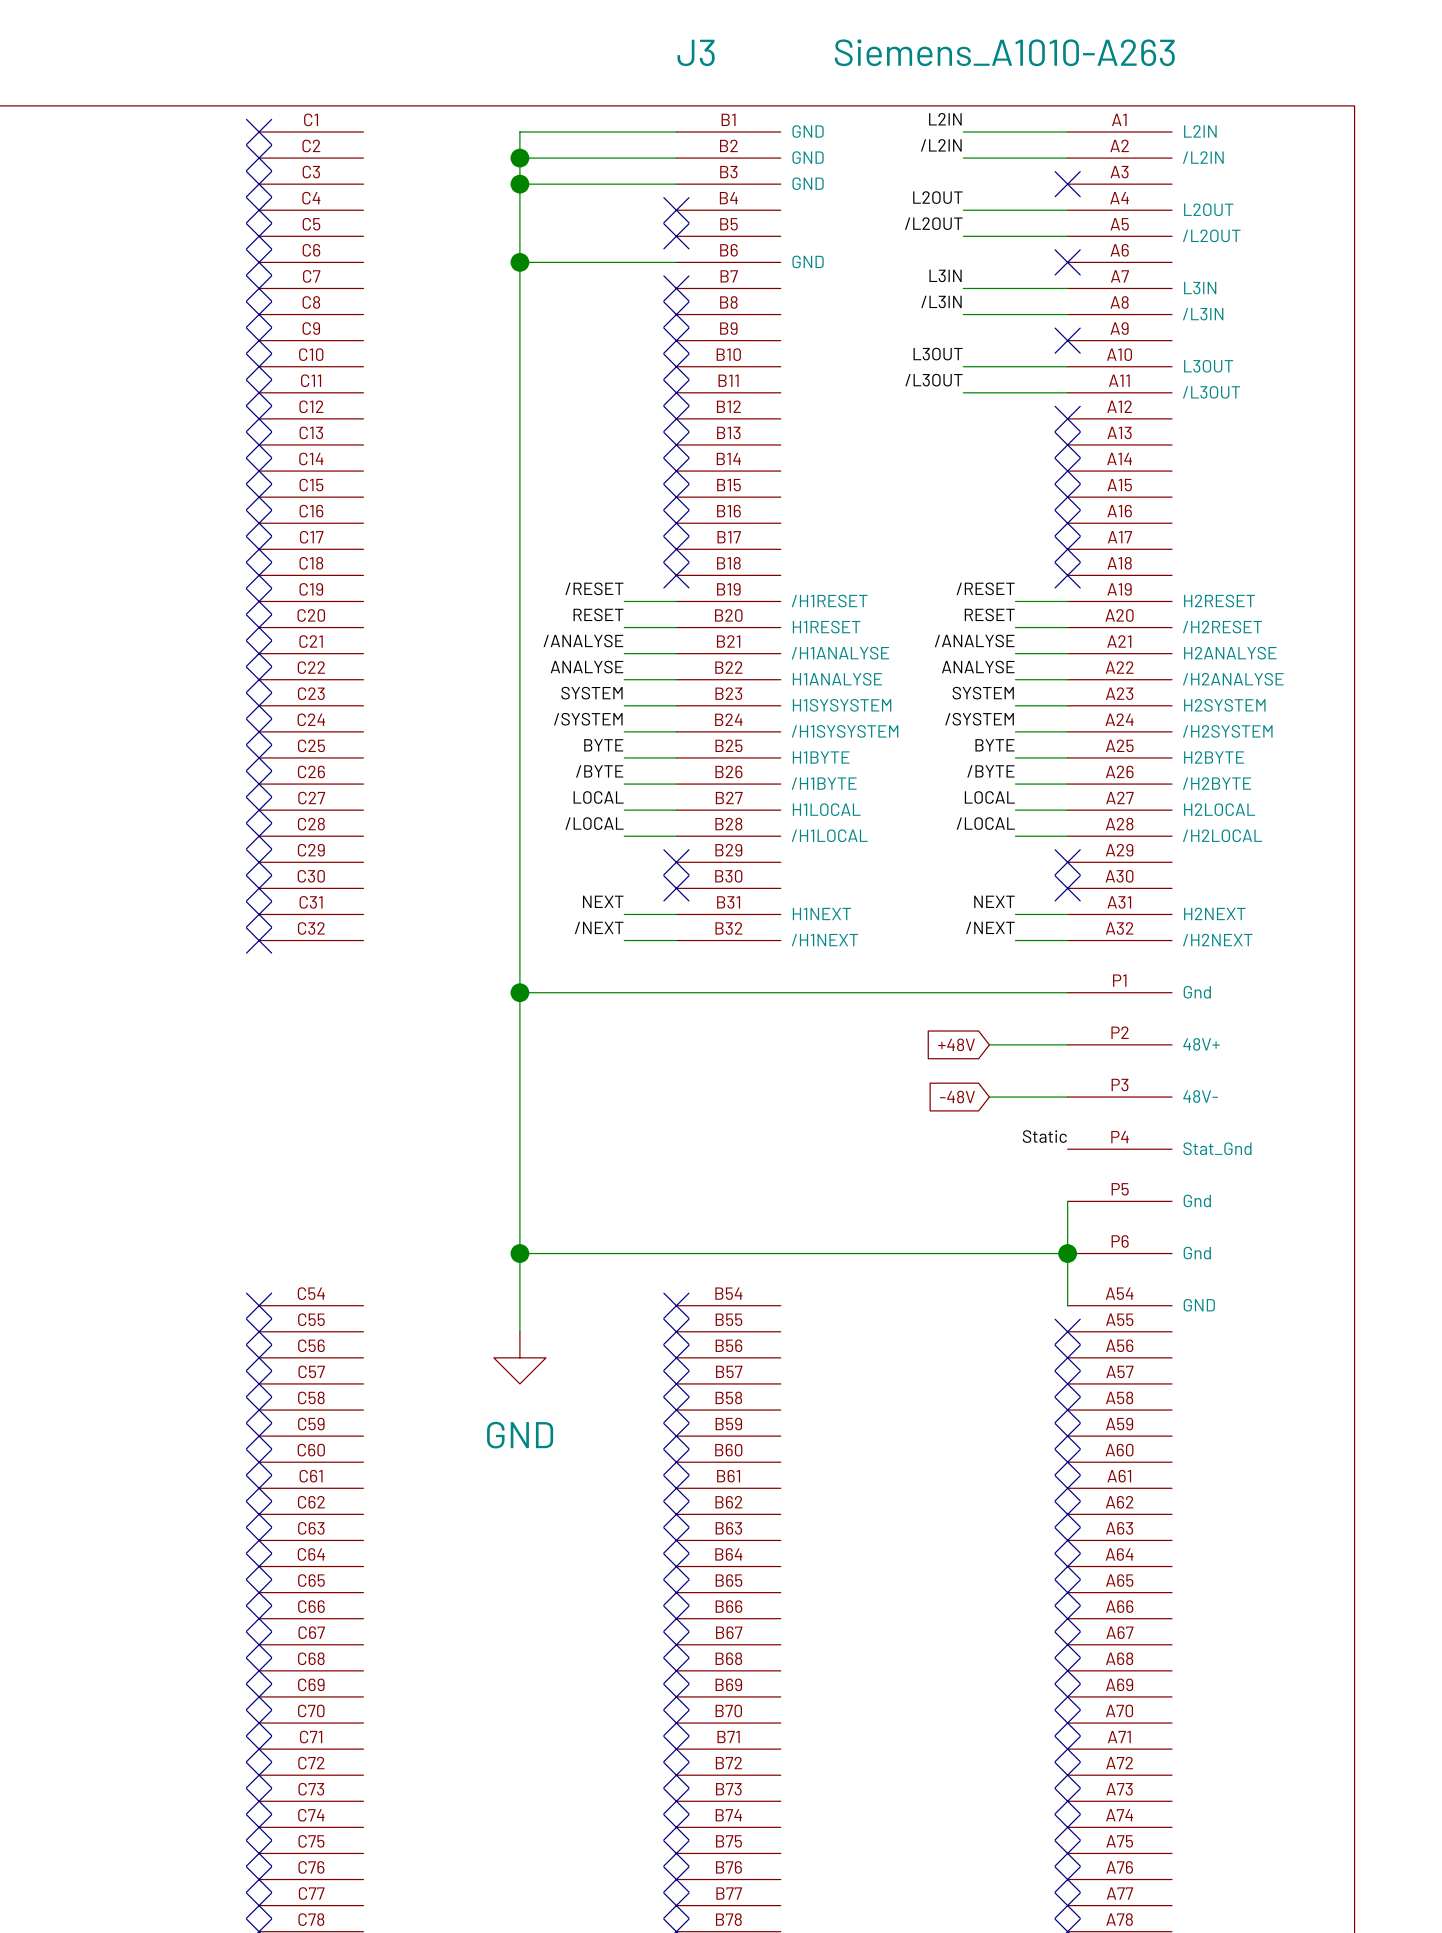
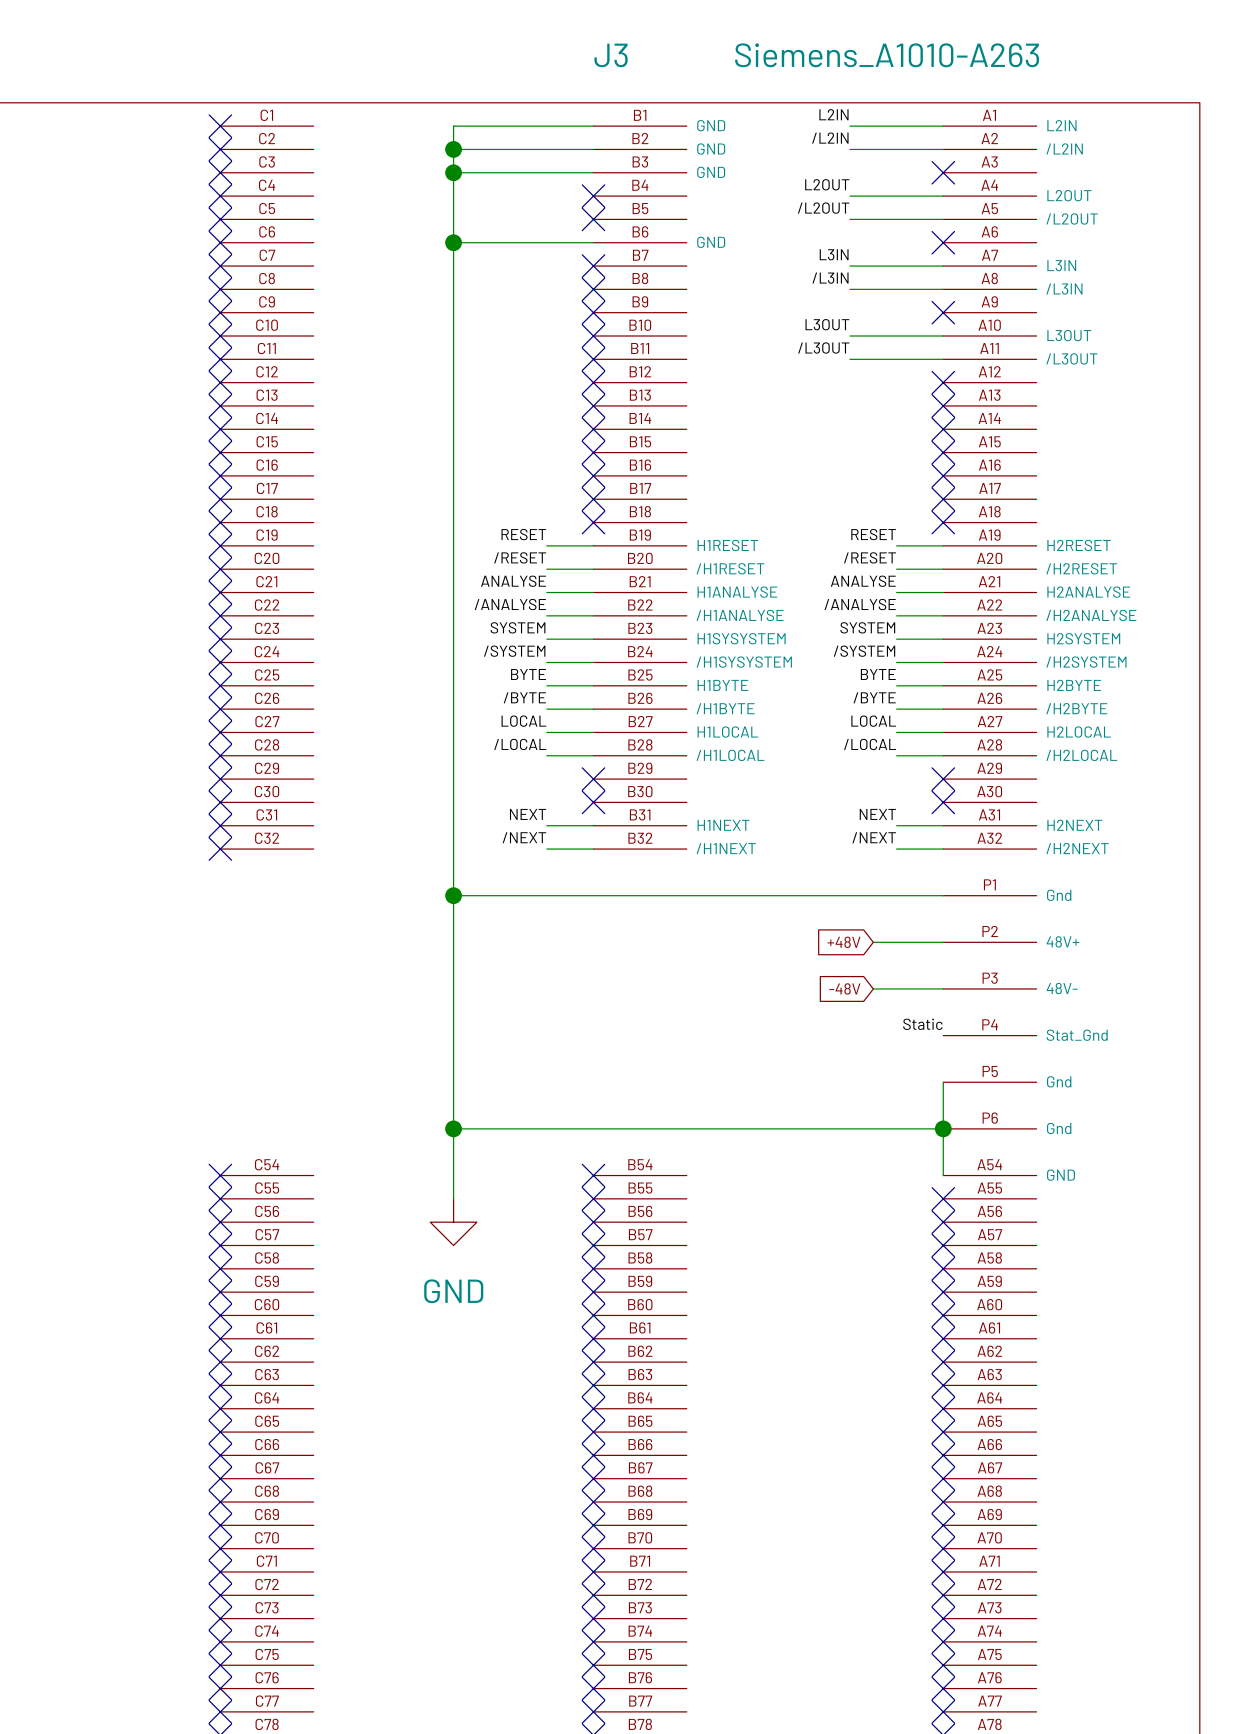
label: /RESET (594, 588) -> RESET (523, 534)
label: /RESET (985, 588) -> RESET (873, 534)
J3 pin name: /H1RESET (829, 601) -> H1RESET (727, 545)
label: RESET (598, 614) -> /RESET (520, 557)
label: RESET (989, 614) -> /RESET (869, 557)
J3 pin name: H1RESET (826, 627) -> /H1RESET (730, 568)
label: /ANALYSE (583, 640) -> ANALYSE (513, 581)
label: /ANALYSE (974, 640) -> ANALYSE (863, 581)
J3 pin name: /H1ANALYSE (840, 653) -> H1ANALYSE (737, 592)
label: ANALYSE (586, 667) -> /ANALYSE (510, 604)
label: ANALYSE (978, 667) -> /ANALYSE (860, 604)
J3 pin name: H1ANALYSE (837, 679) -> /H1ANALYSE (740, 615)

